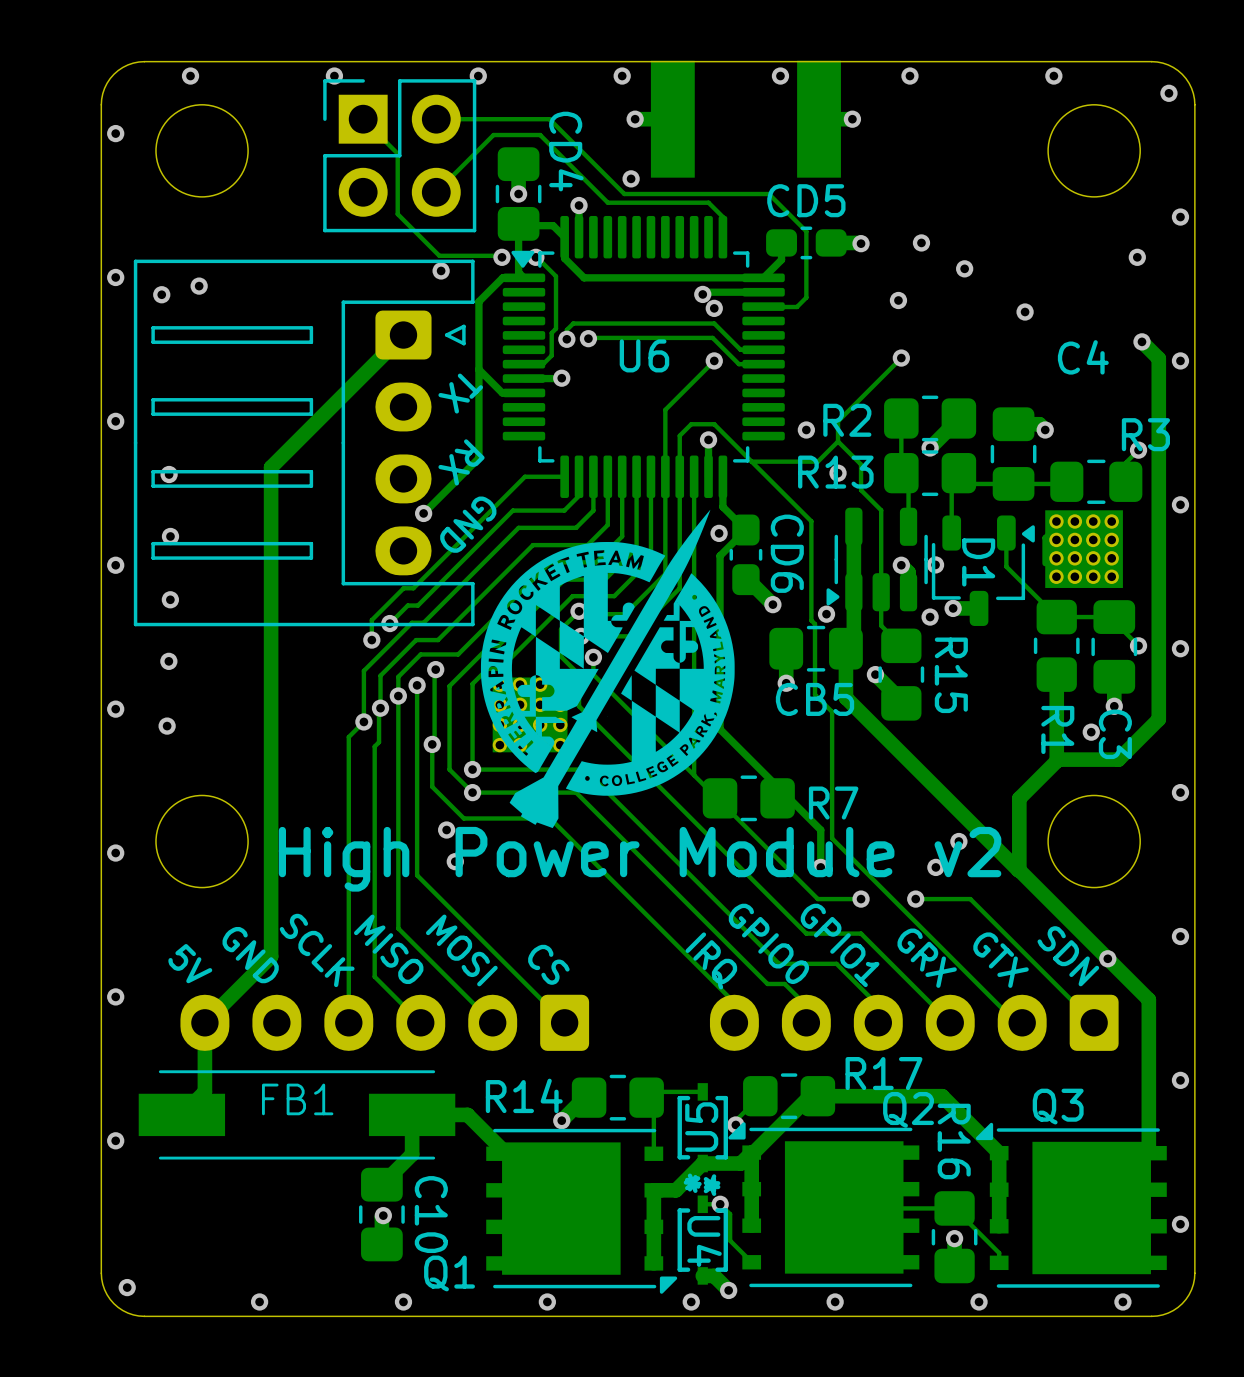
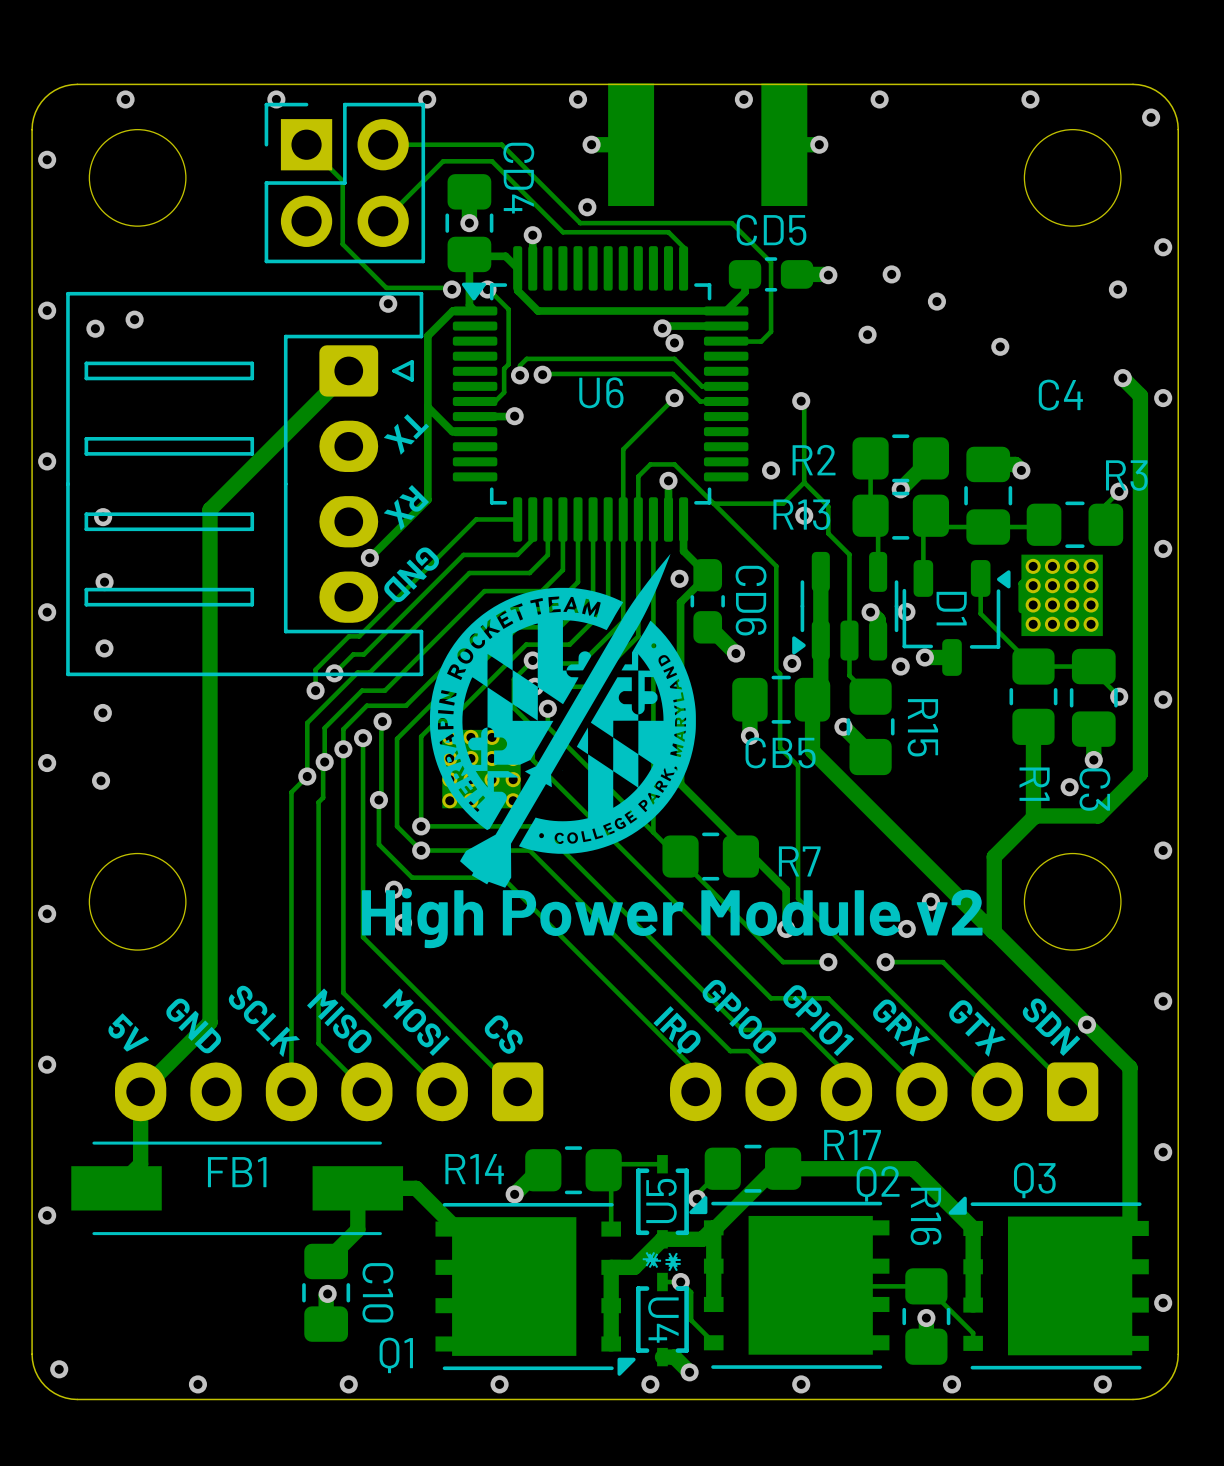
track: (904, 355) (838, 421) -> (801, 401) (804, 404) (804, 461)
via position: (901, 358) -> (801, 401)

